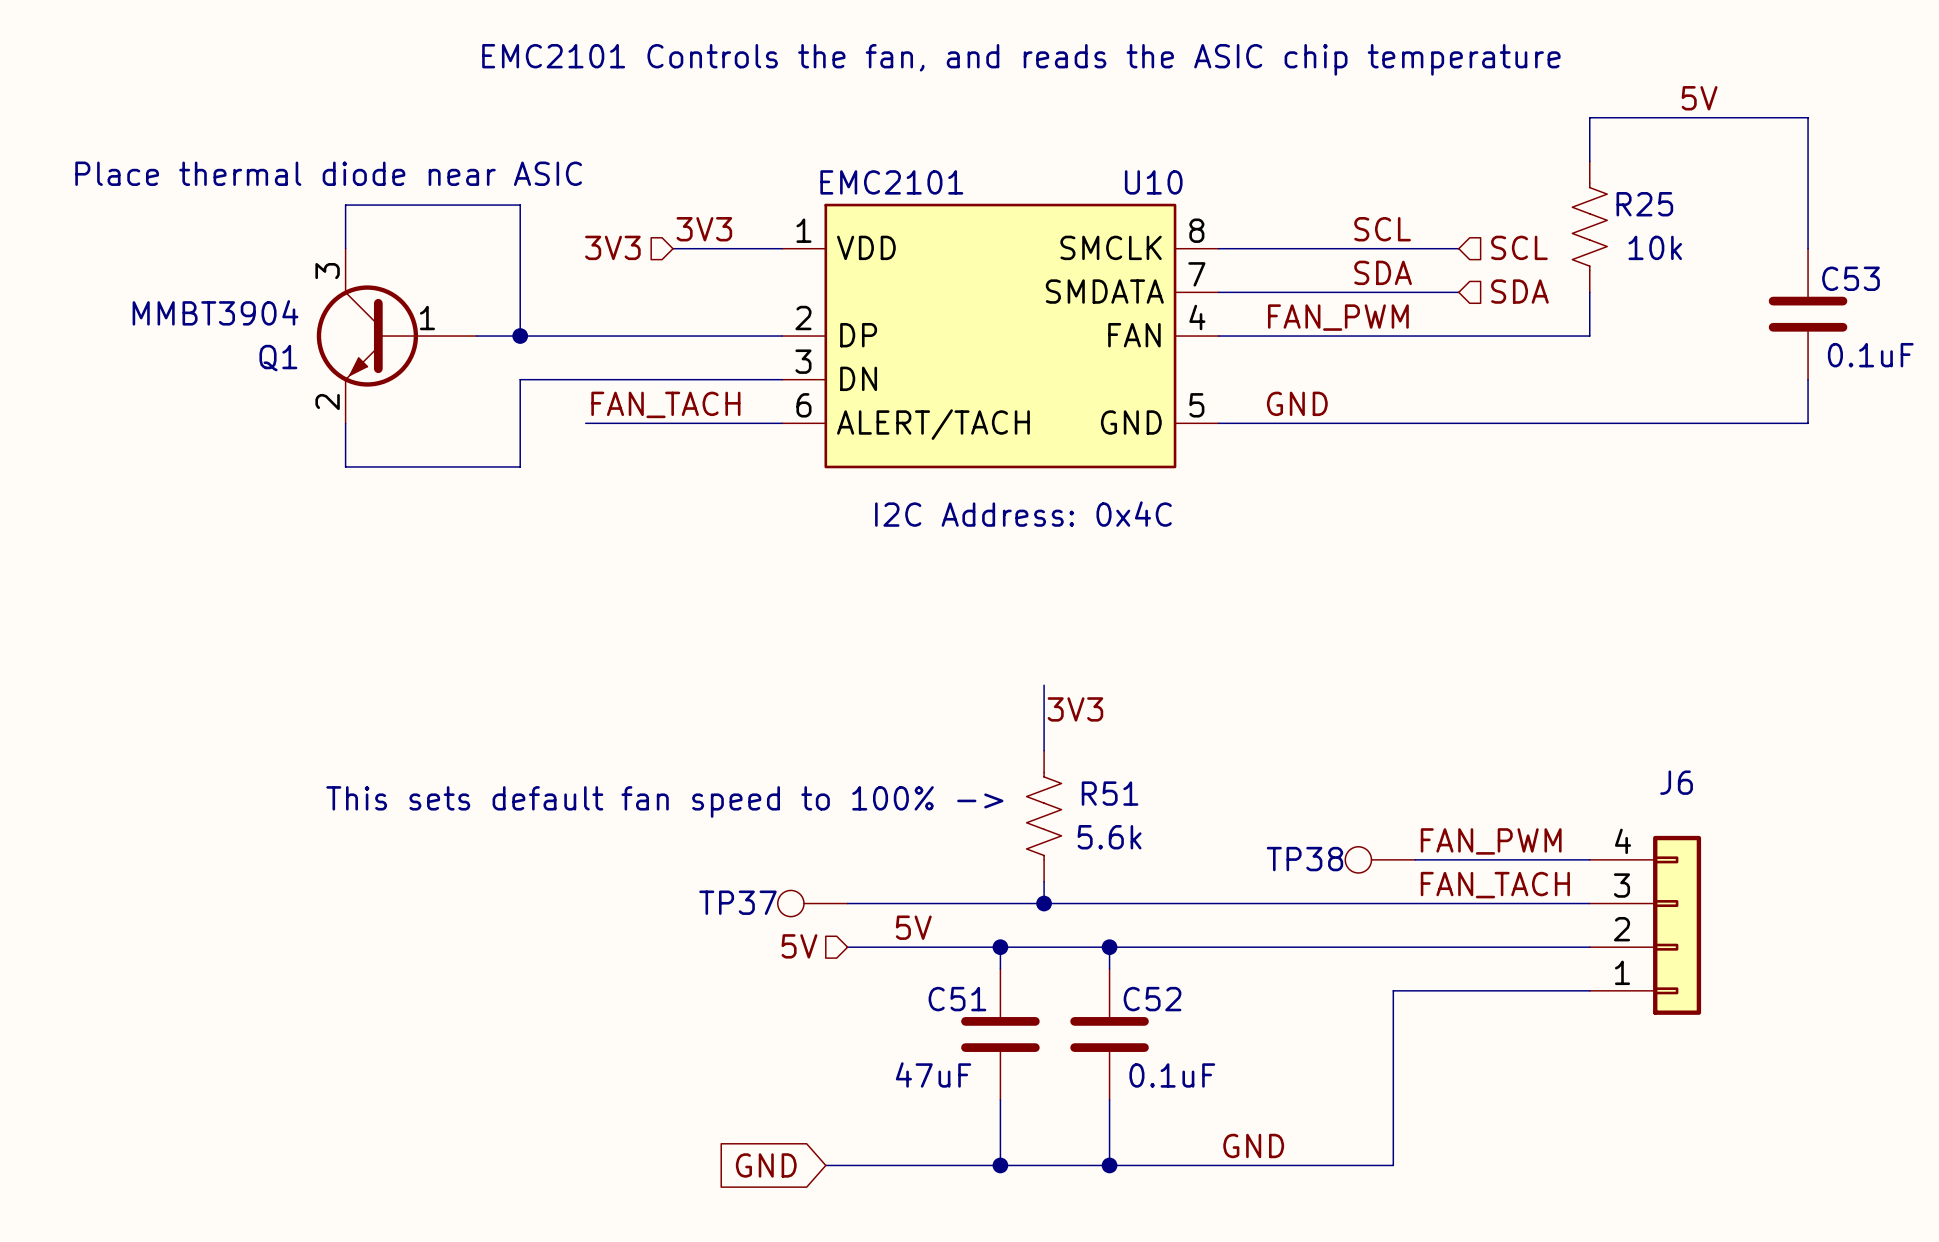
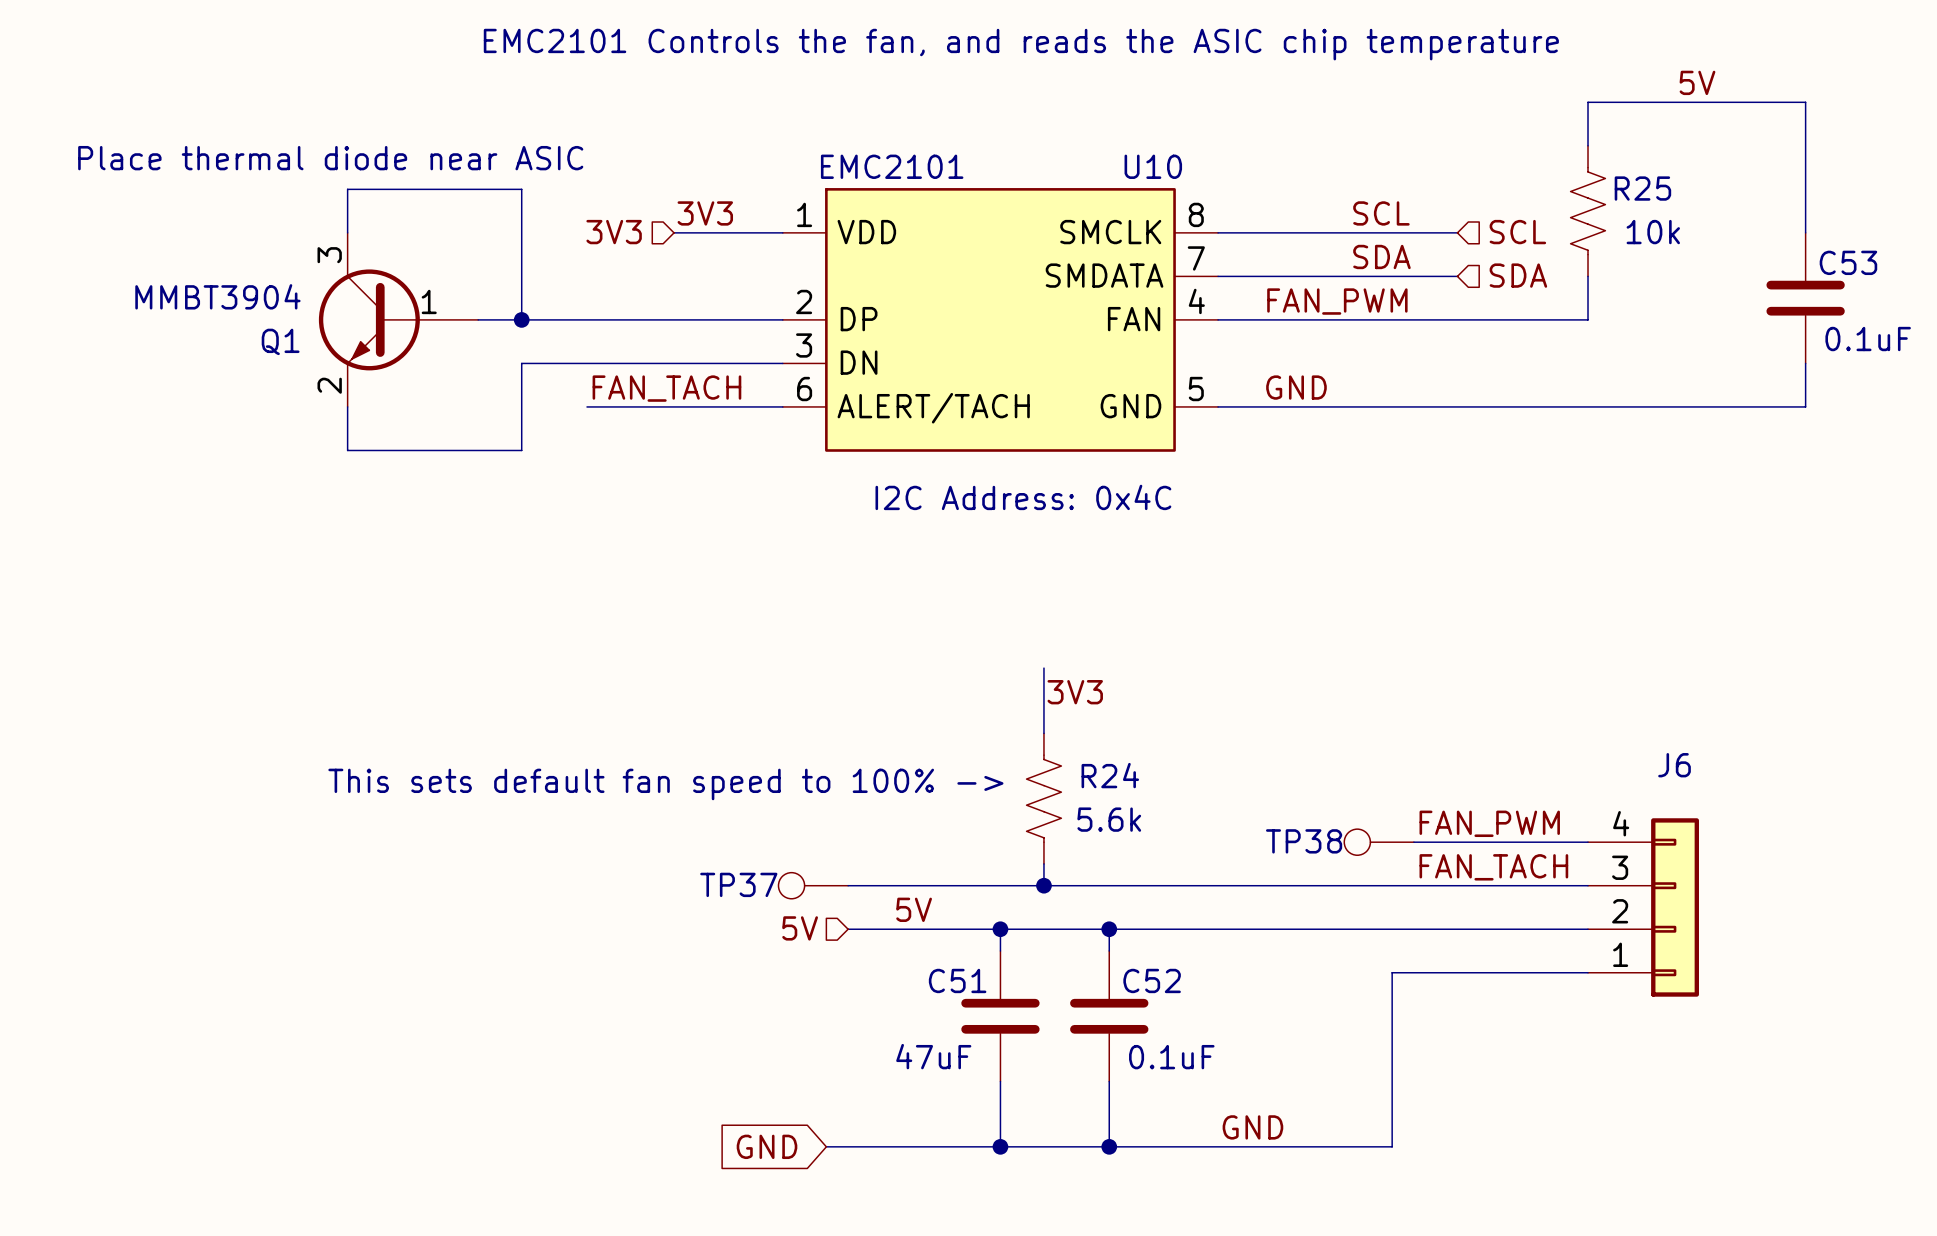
R51 name: R51 (1110, 793) -> R24 (1110, 775)

